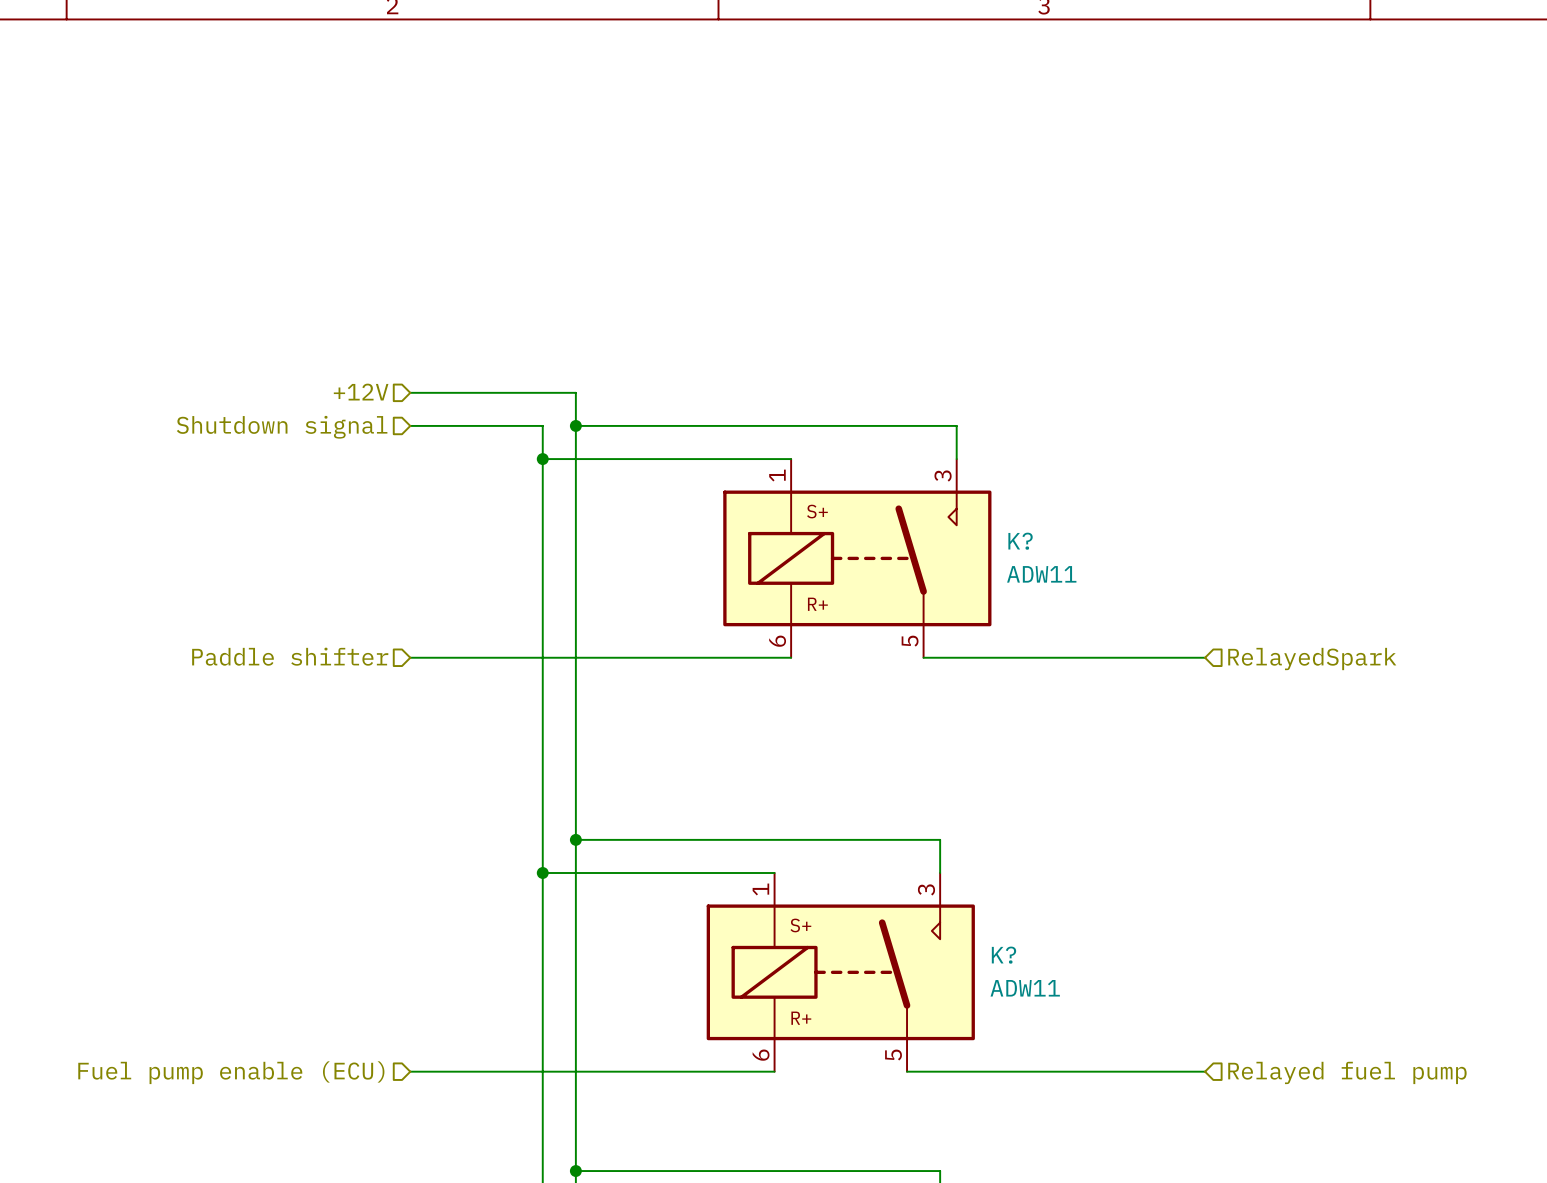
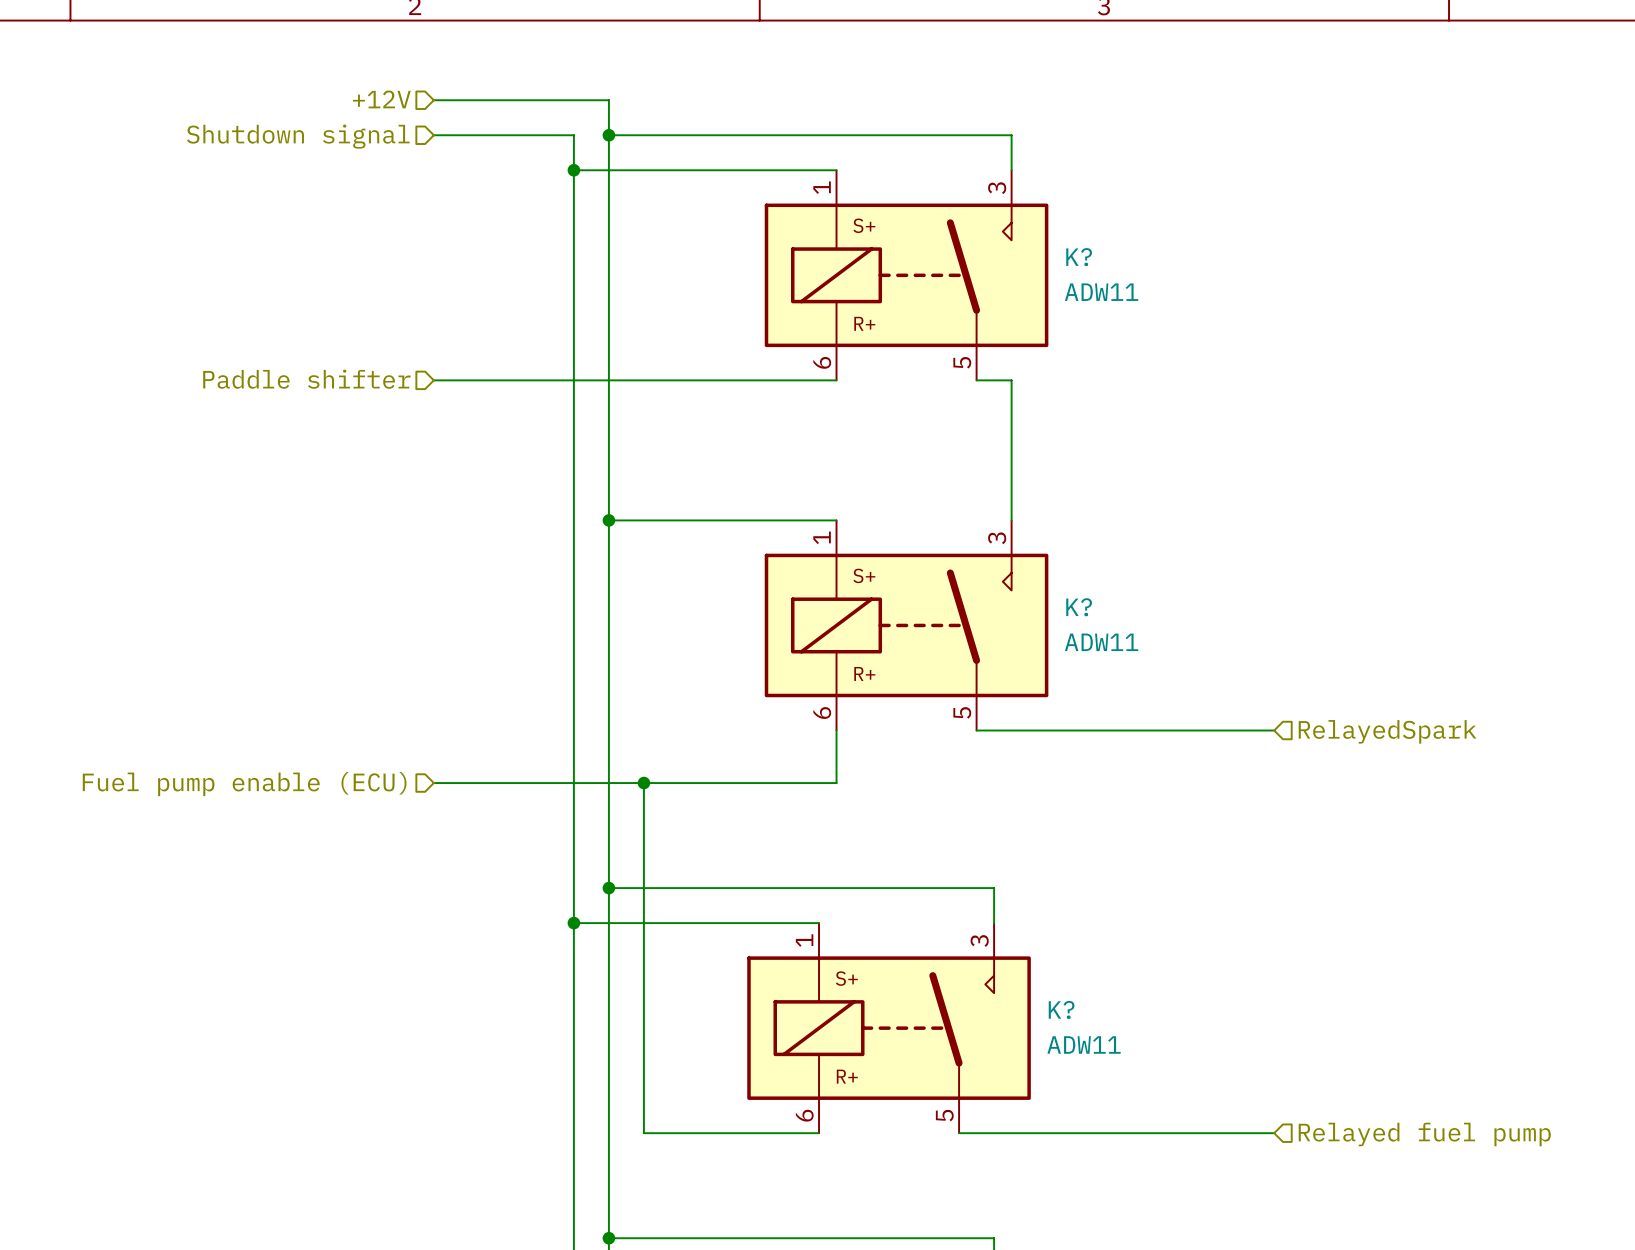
wire: none -> (608, 135) (1011, 135) (1011, 170)
junction: none -> (608, 135)
junction: none -> (573, 170)
K?: none -> ADW11 (906, 275)
hierarchical label position: +12V (361, 392) -> +12V (381, 99)
wire: (410, 392) (575, 392) -> (433, 100) (608, 100) (608, 415)
wire: (410, 425) (542, 425) -> (433, 135) (573, 135) (573, 450)
wire: (575, 425) (956, 425) -> (976, 380) (1011, 380) (1011, 450)
junction: (575, 425) -> none
hierarchical label position: Shutdown signal (282, 427) -> Shutdown signal (298, 136)
wire: (542, 459) (791, 459) -> (573, 170) (836, 170)
junction: (542, 459) -> none
wire: none -> (608, 520) (836, 520)
junction: none -> (608, 520)
K? position: (857, 558) -> (906, 625)
hierarchical label position: Paddle shifter (290, 656) -> Paddle shifter (306, 379)
wire: (410, 657) (791, 657) -> (433, 380) (836, 380)
wire: (923, 657) (1205, 657) -> (976, 730) (1274, 730)
hierarchical label position: RelayedSpark (1312, 659) -> RelayedSpark (1387, 731)
wire: none -> (836, 730) (836, 783) (433, 783)
junction: none -> (643, 783)
hierarchical label: none -> Fuel pump enable (ECU) (244, 784)
wire: (410, 1071) (608, 1071) -> (643, 783) (643, 1133)
hierarchical label: Fuel pump enable (ECU) (231, 1072) -> none

